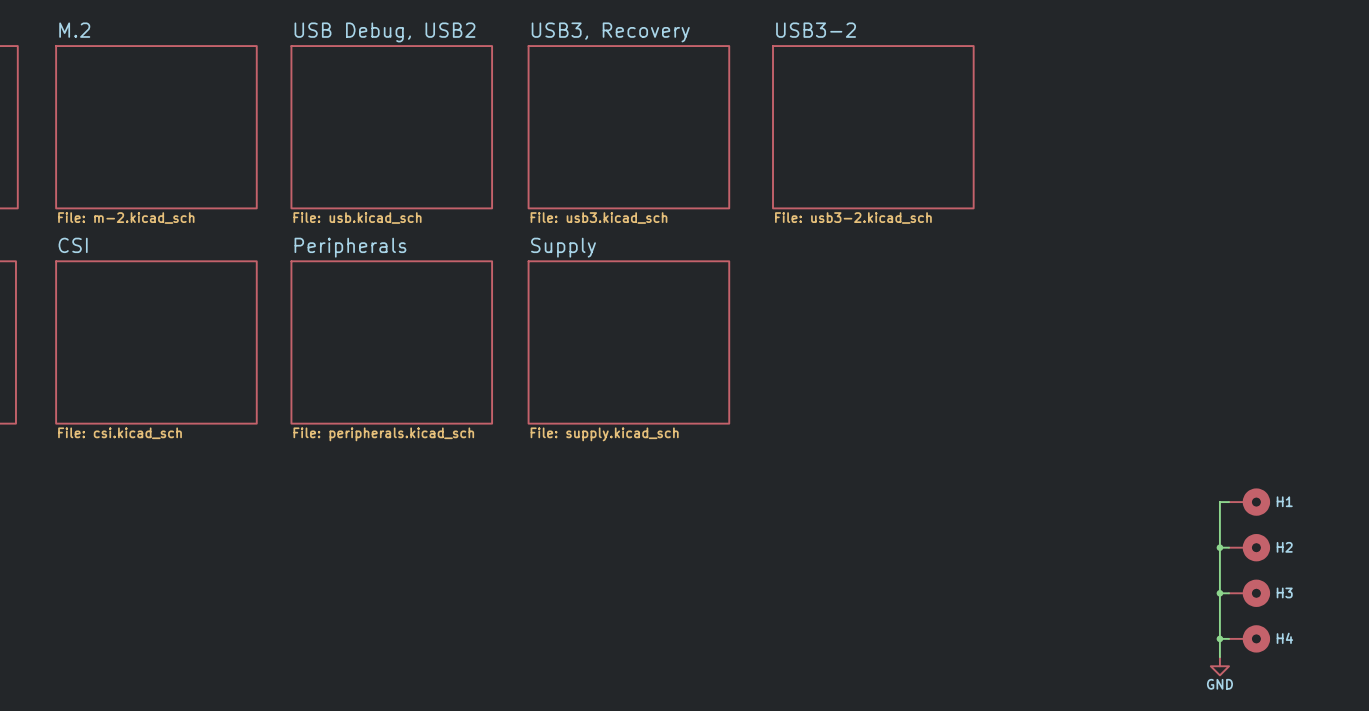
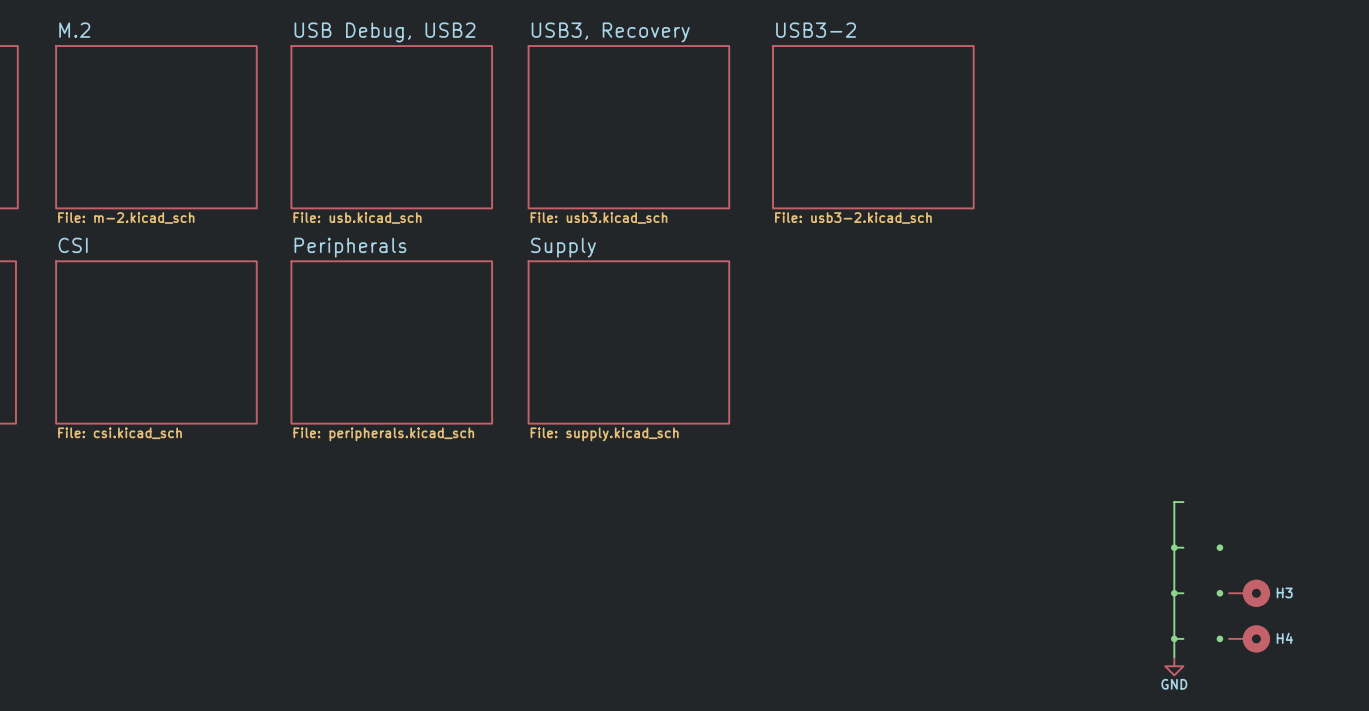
wire: (1229, 502) (1219, 502) (1219, 657) -> (1183, 502) (1174, 502) (1174, 657)
H1: (1249, 502) -> none
junction: none -> (1174, 547)
wire: (1219, 547) (1229, 547) -> (1174, 547) (1183, 547)
H2: (1249, 547) -> none
junction: none -> (1174, 593)
wire: (1219, 593) (1229, 593) -> (1174, 593) (1183, 593)
junction: none -> (1174, 638)
wire: (1219, 638) (1229, 638) -> (1174, 638) (1183, 638)
power symbol position: GND (1219, 666) -> GND (1174, 666)

